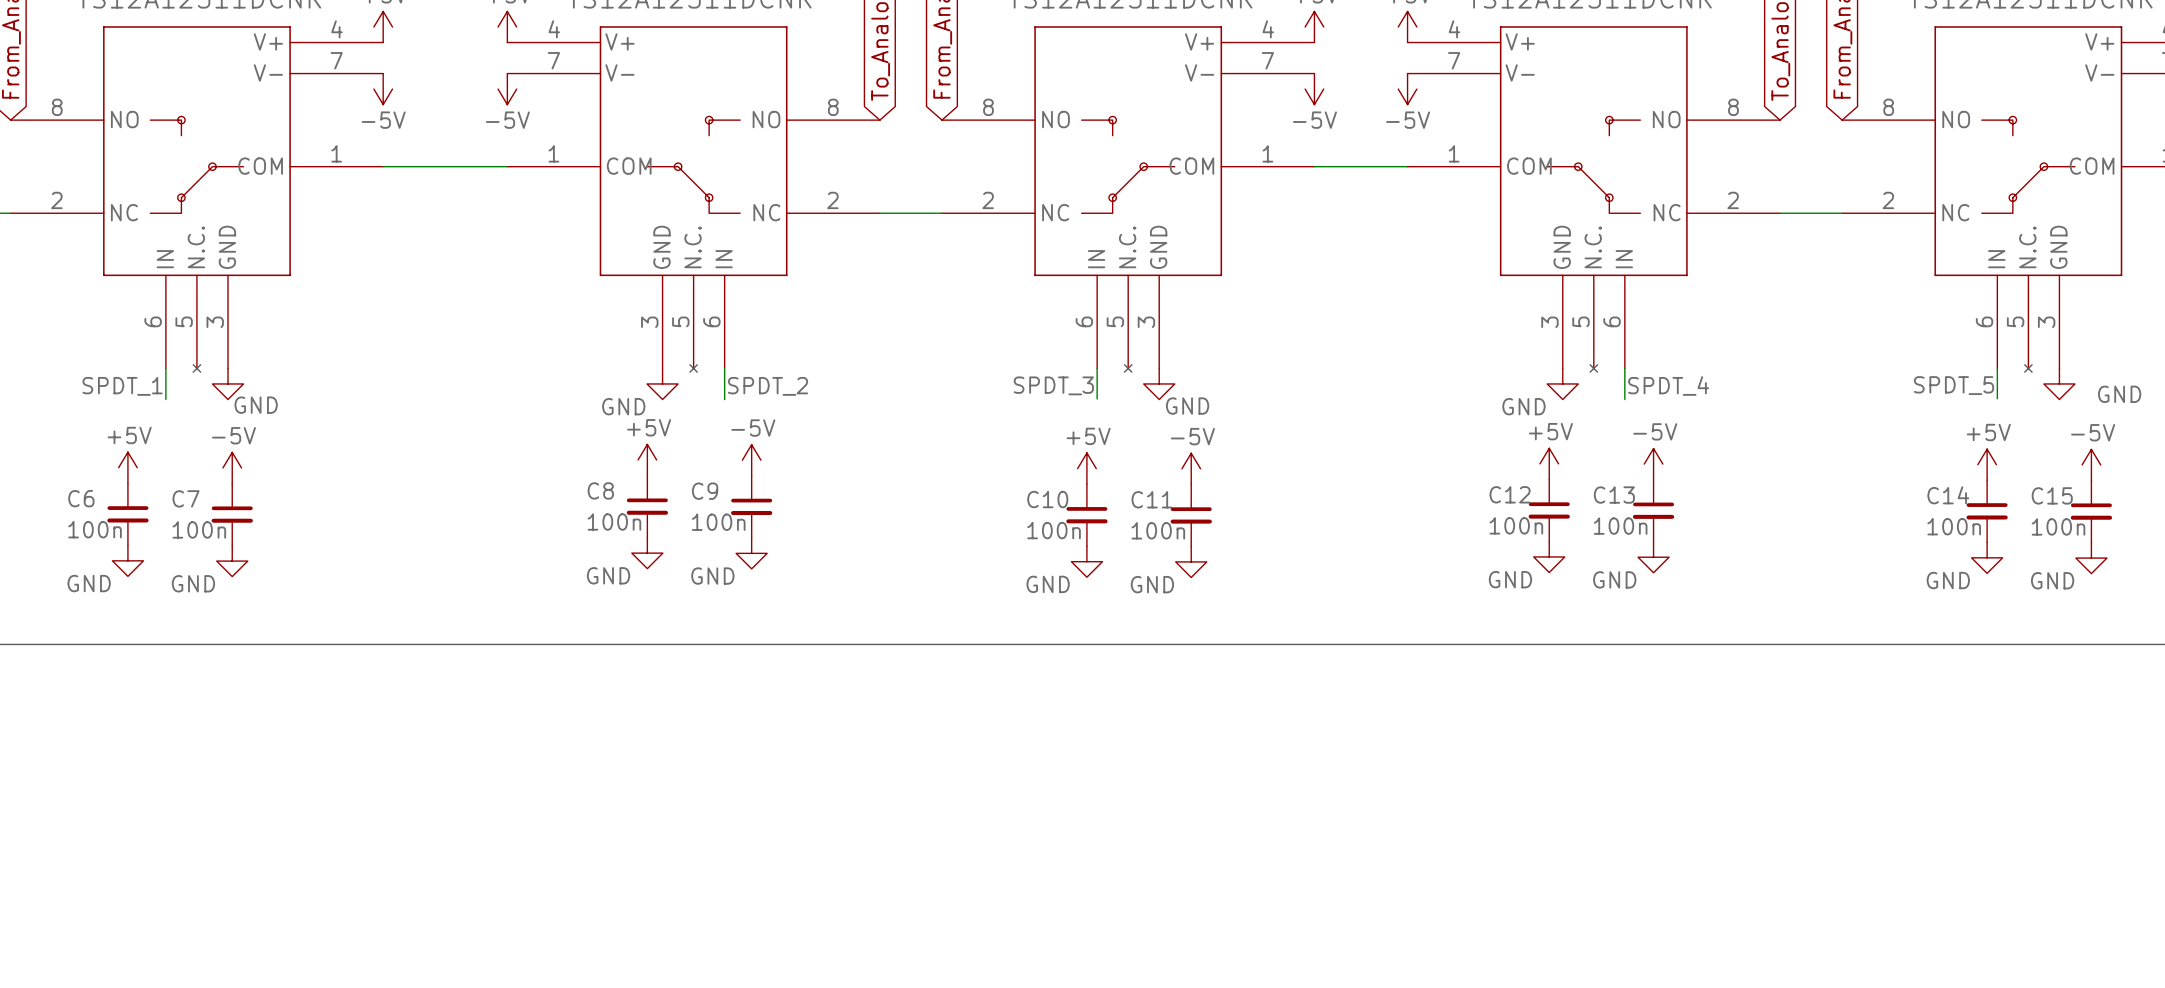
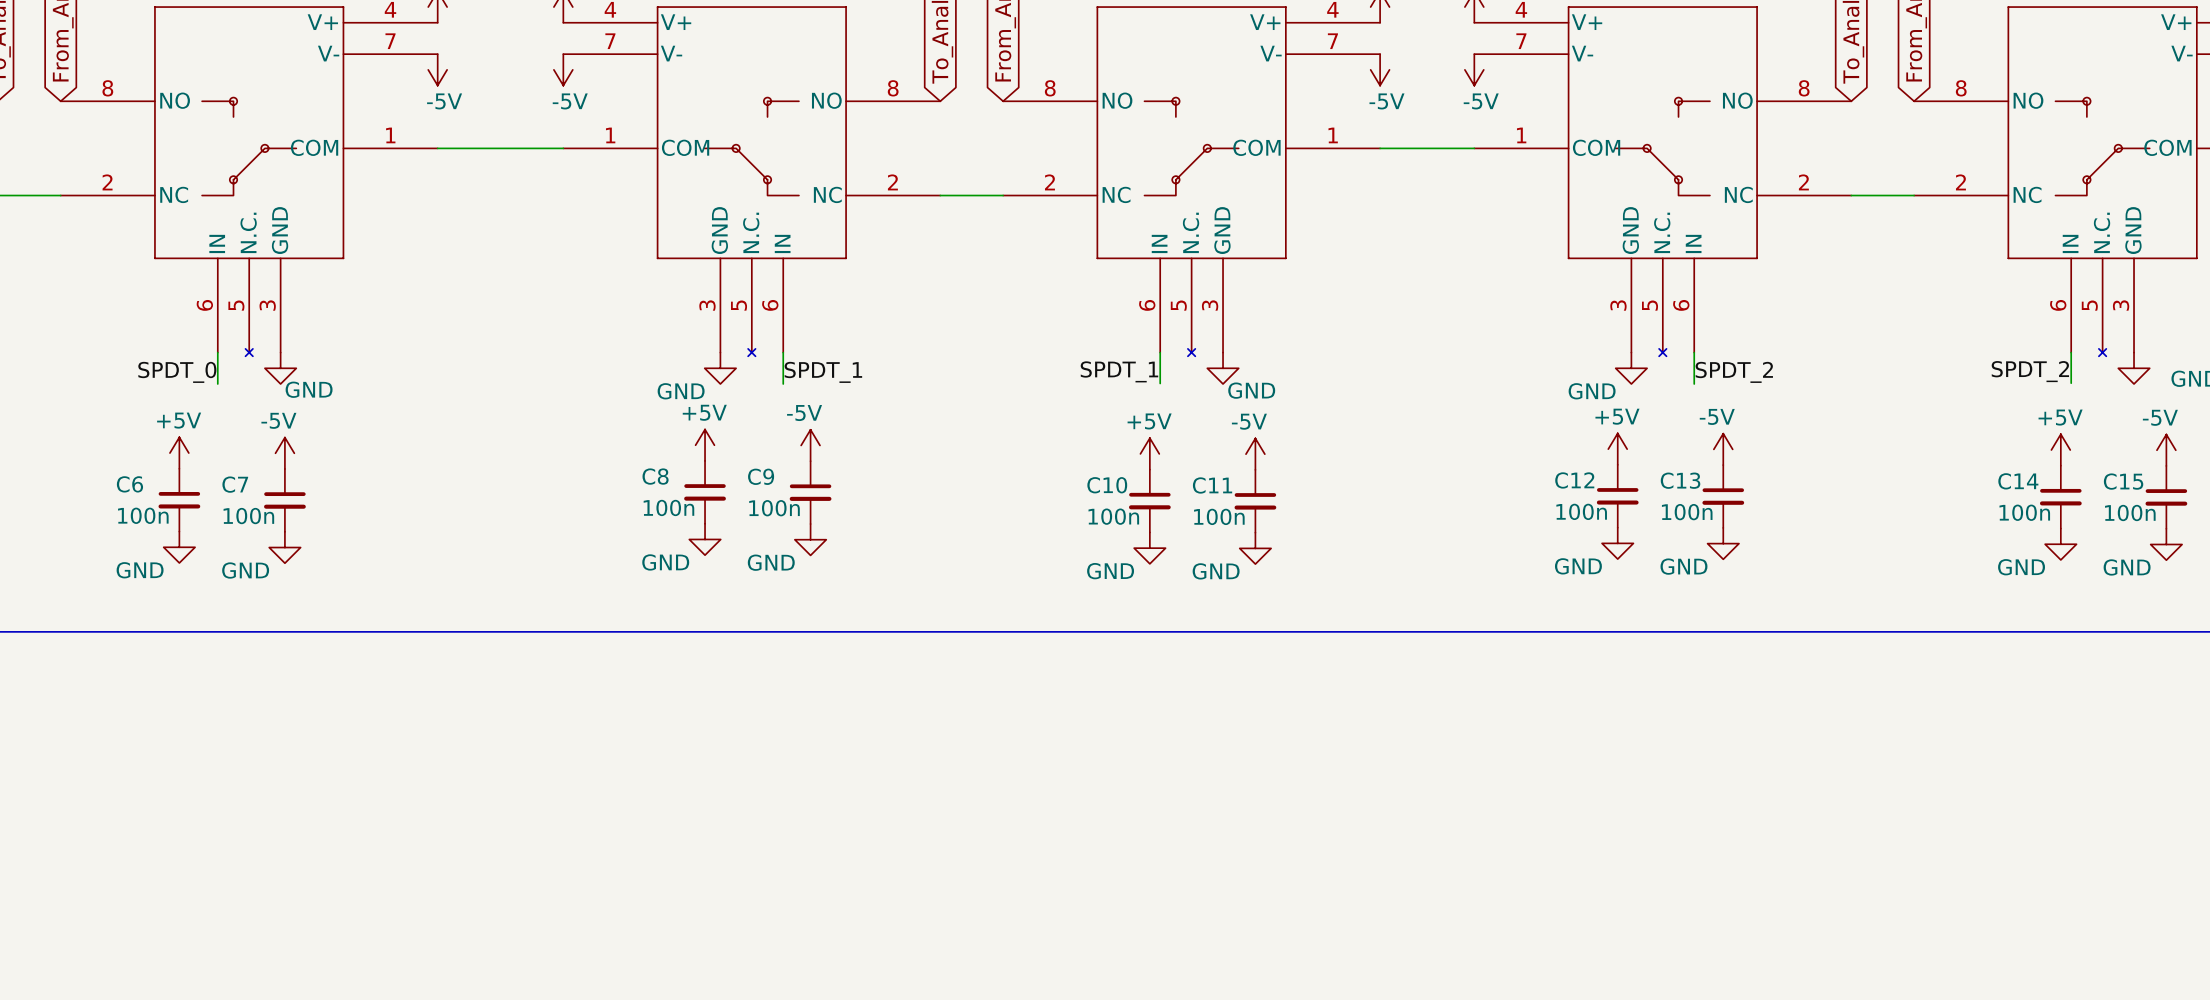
label: SPDT_3 (1053, 385) -> SPDT_1 (1119, 371)
label: SPDT_5 (1953, 385) -> SPDT_2 (2030, 371)
label: SPDT_1 (122, 386) -> SPDT_0 (177, 372)
label: SPDT_2 (768, 386) -> SPDT_1 (823, 372)
label: SPDT_4 (1668, 386) -> SPDT_2 (1734, 372)

